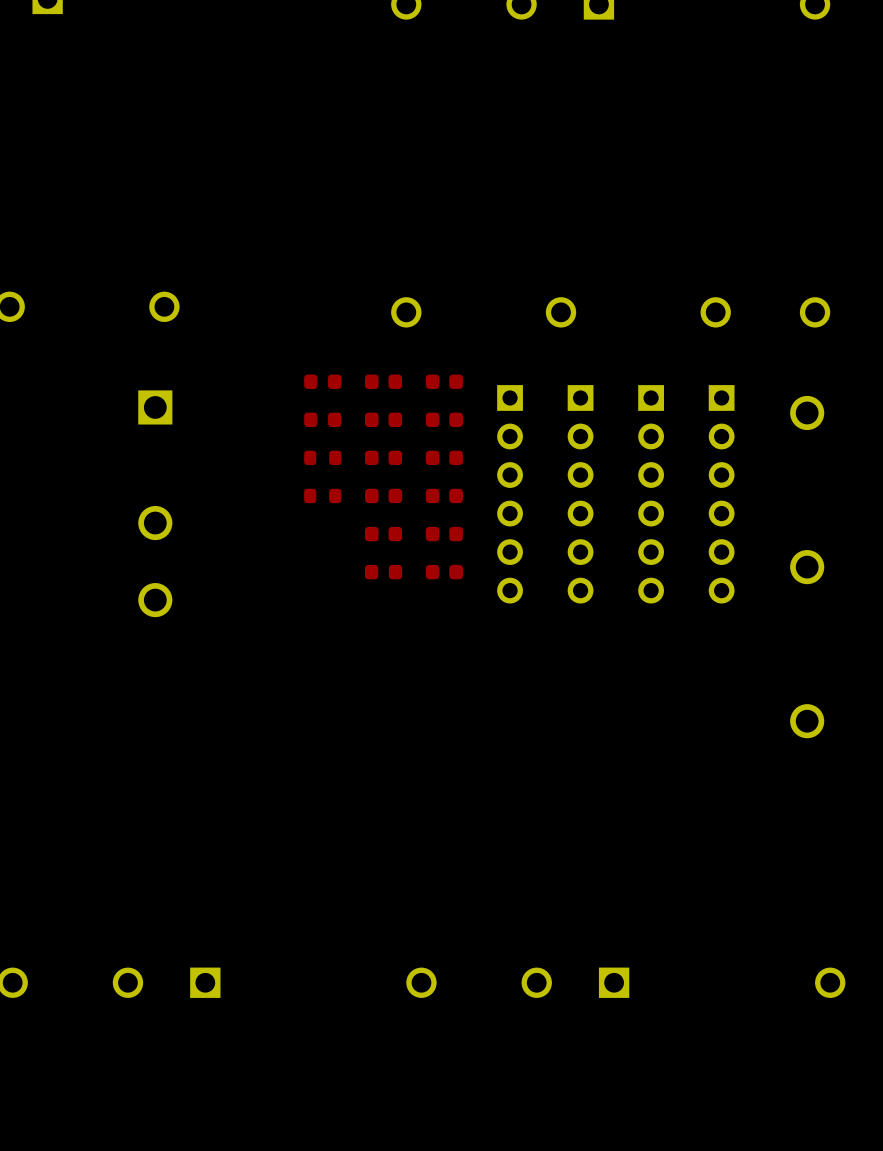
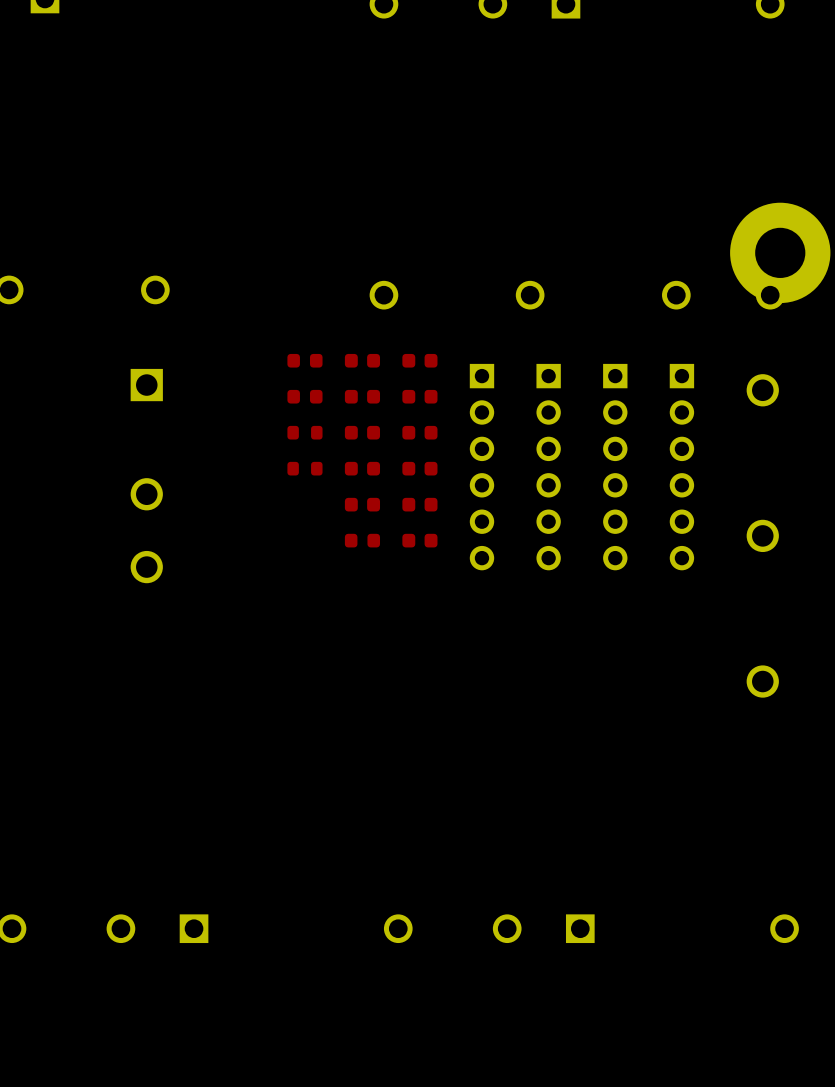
part: none -> (780, 252)

